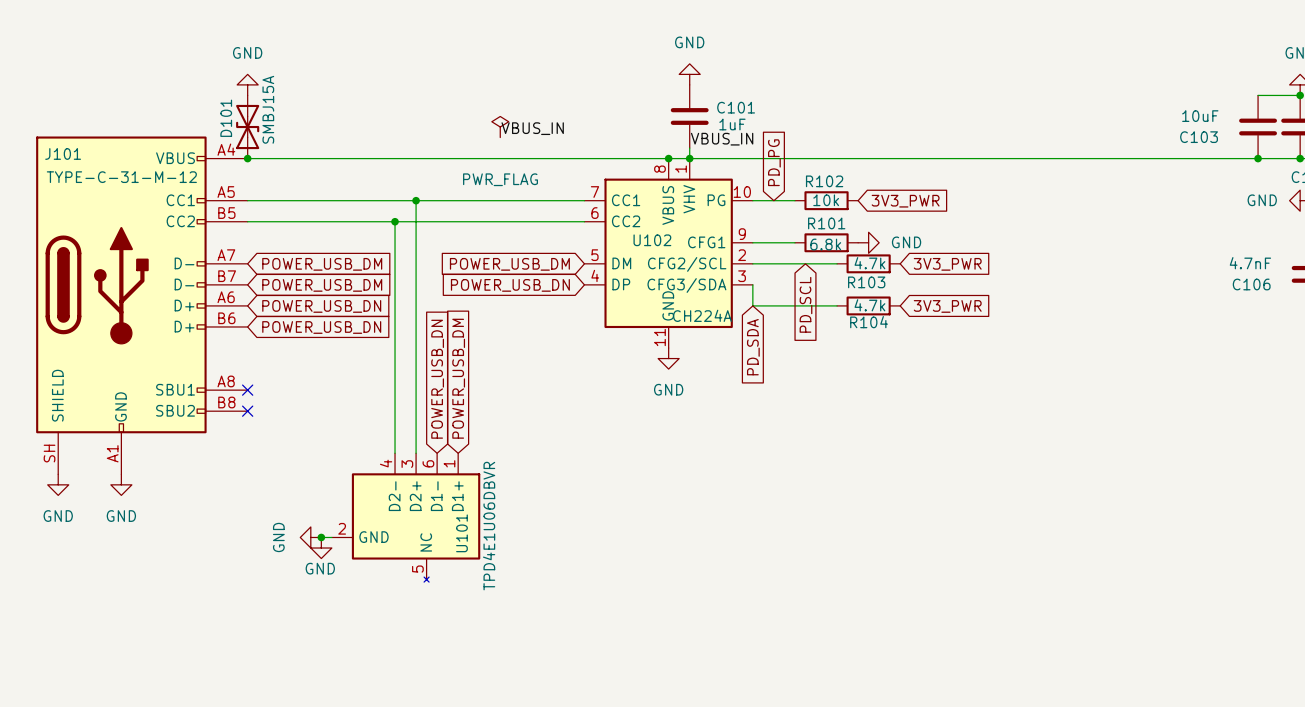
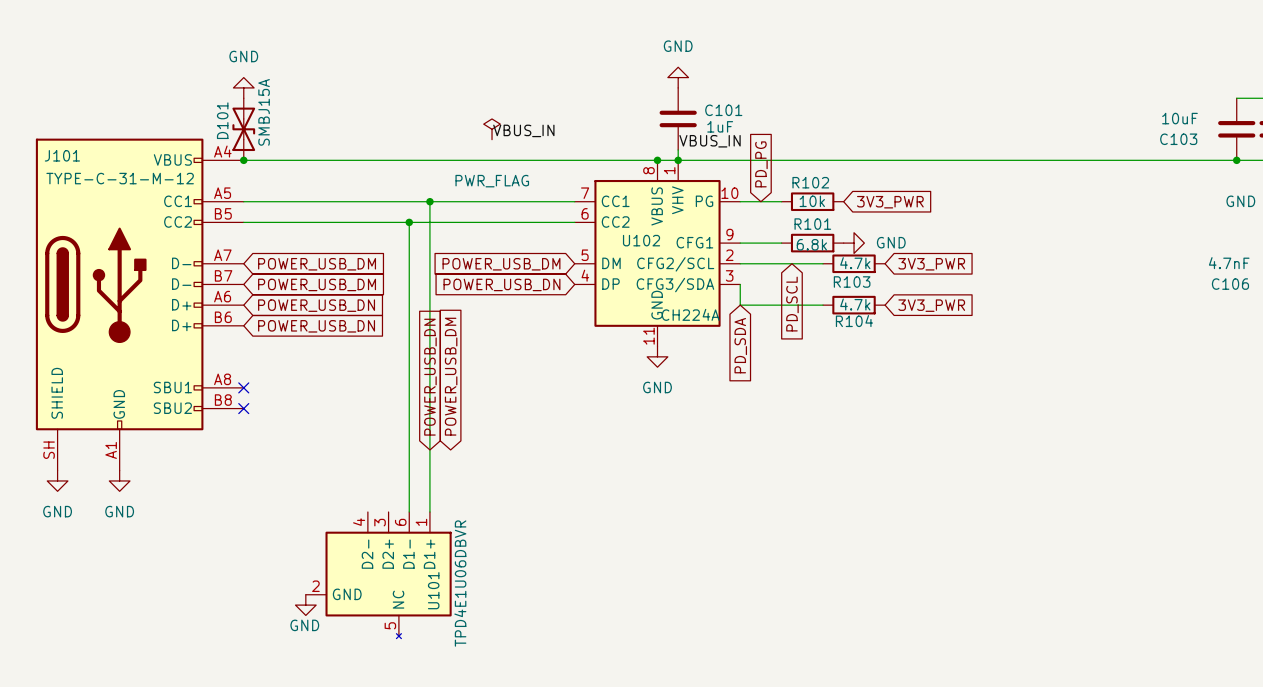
wire: (416, 200) (416, 221) -> none
junction: (416, 200) -> none
wire: none -> (429, 201) (429, 512)
junction: none -> (429, 201)
wire: (395, 221) (395, 453) -> none
junction: (395, 221) -> none
junction: none -> (409, 222)
U101 position: (406, 517) -> (378, 575)
power symbol: GND (310, 537) -> none
wire: (321, 537) (331, 537) -> none
junction: (321, 537) -> none
power symbol: GND (321, 548) -> none
power symbol: none -> GND (305, 605)

